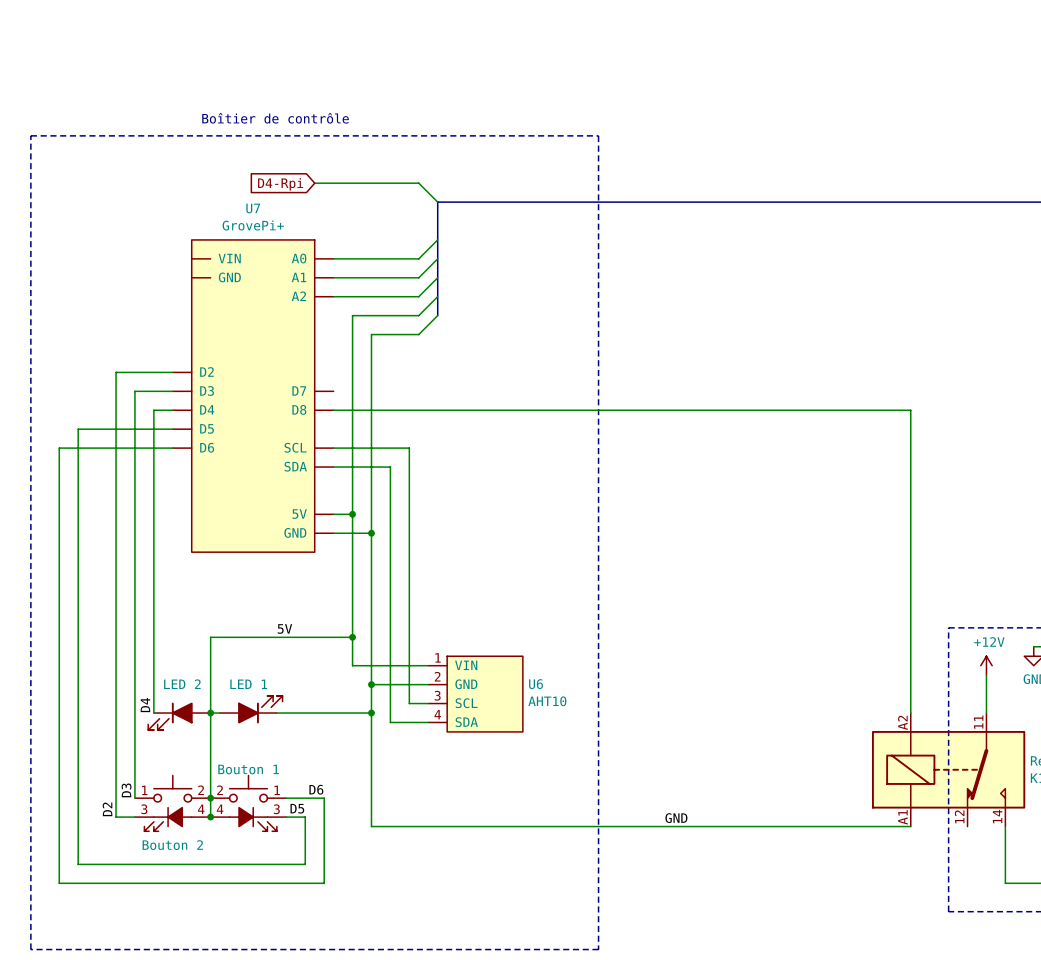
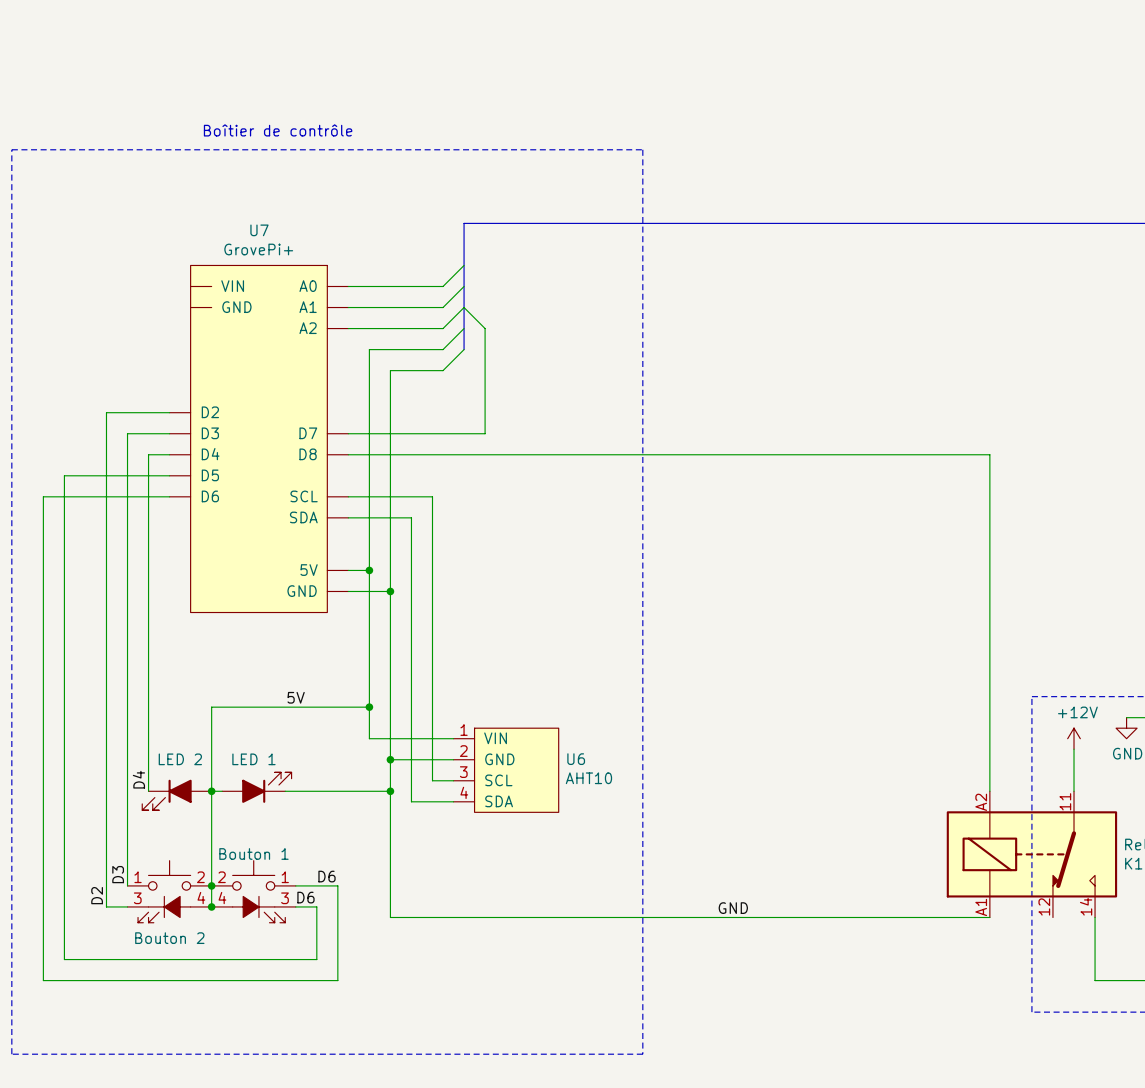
wire: (314, 183) (418, 183) (437, 202) -> none
global label: D4-Rpi (280, 184) -> none
wire: none -> (464, 307) (485, 328) (485, 433) (348, 433)
label: D5 (297, 808) -> D6 (305, 897)

